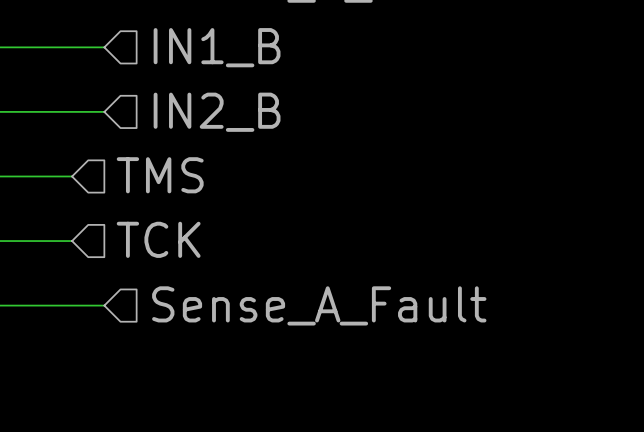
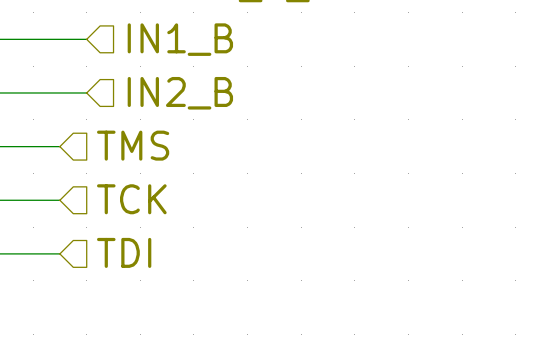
hierarchical label: none -> TDI (124, 252)
wire: (72, 305) (104, 305) -> none
hierarchical label: Sense_A_Fault (319, 305) -> none

